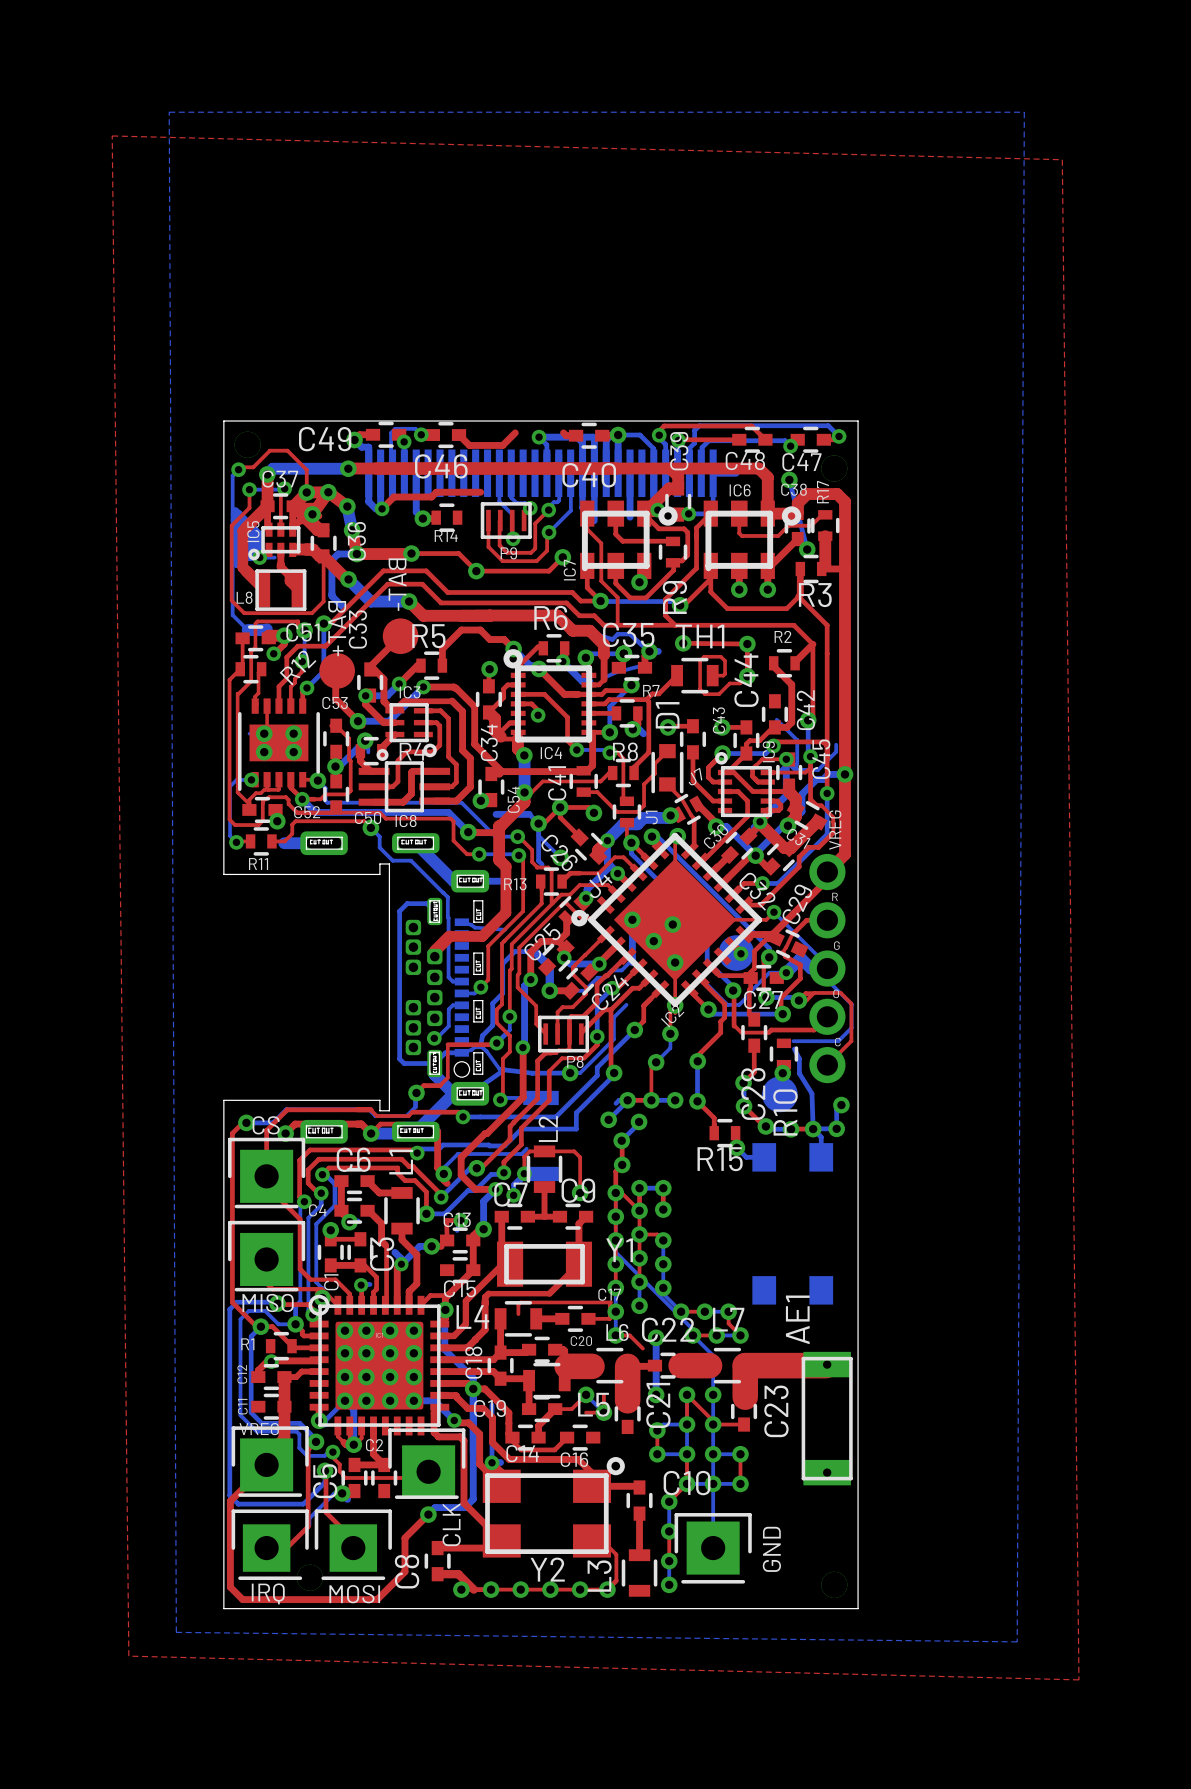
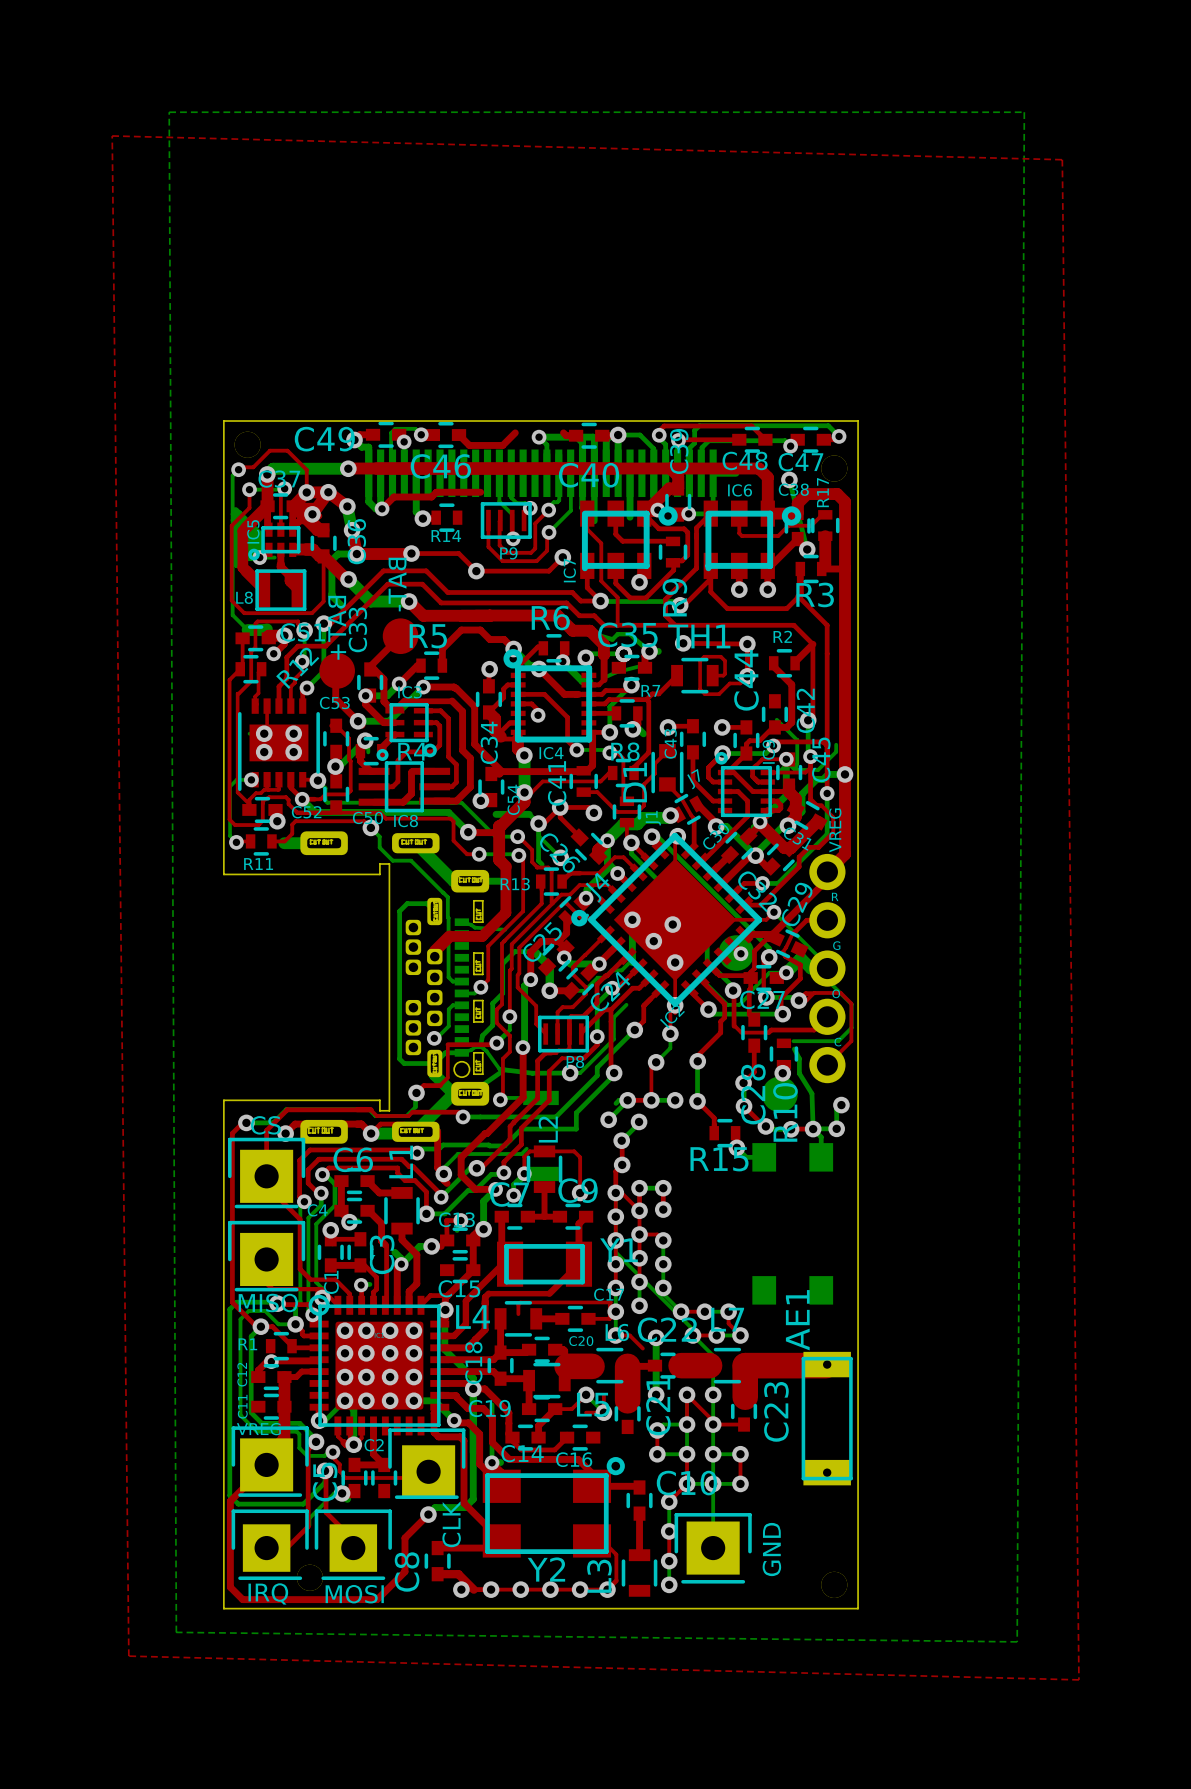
D1 name position: D1 (667, 715) -> D1 (635, 782)
C43 name position: C43 (718, 720) -> C43 (670, 743)

